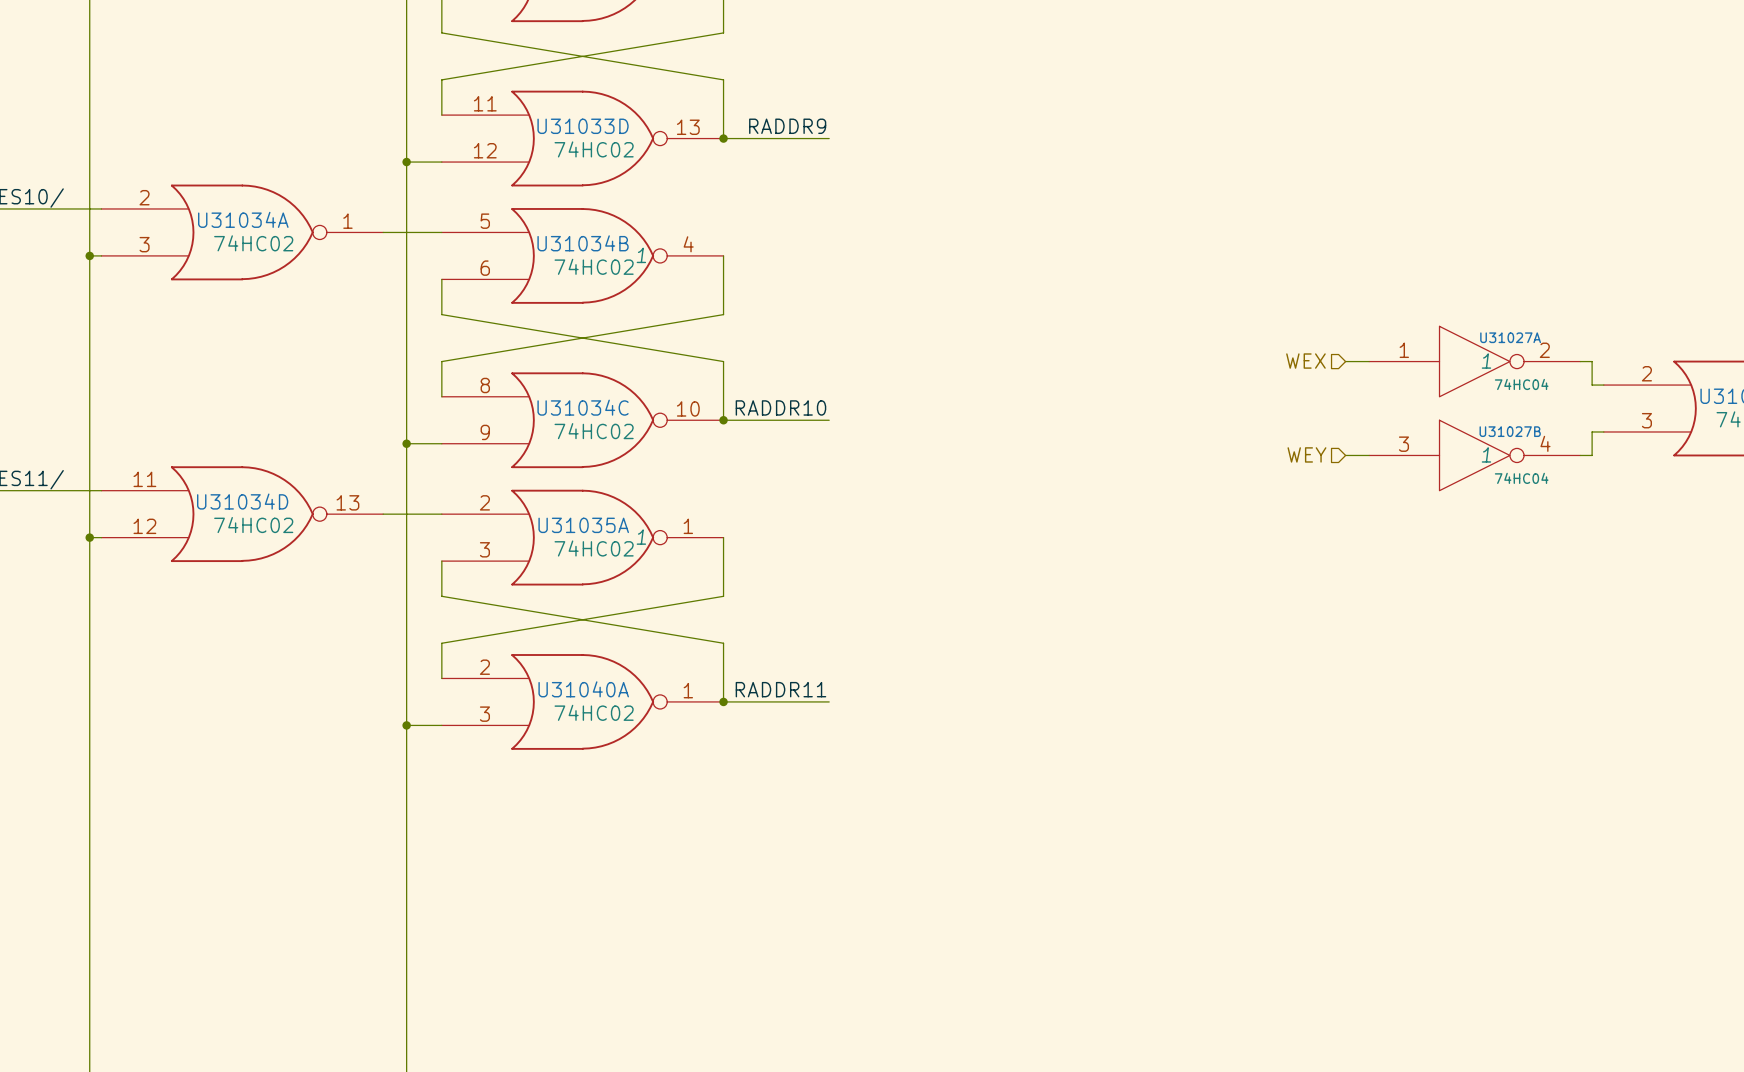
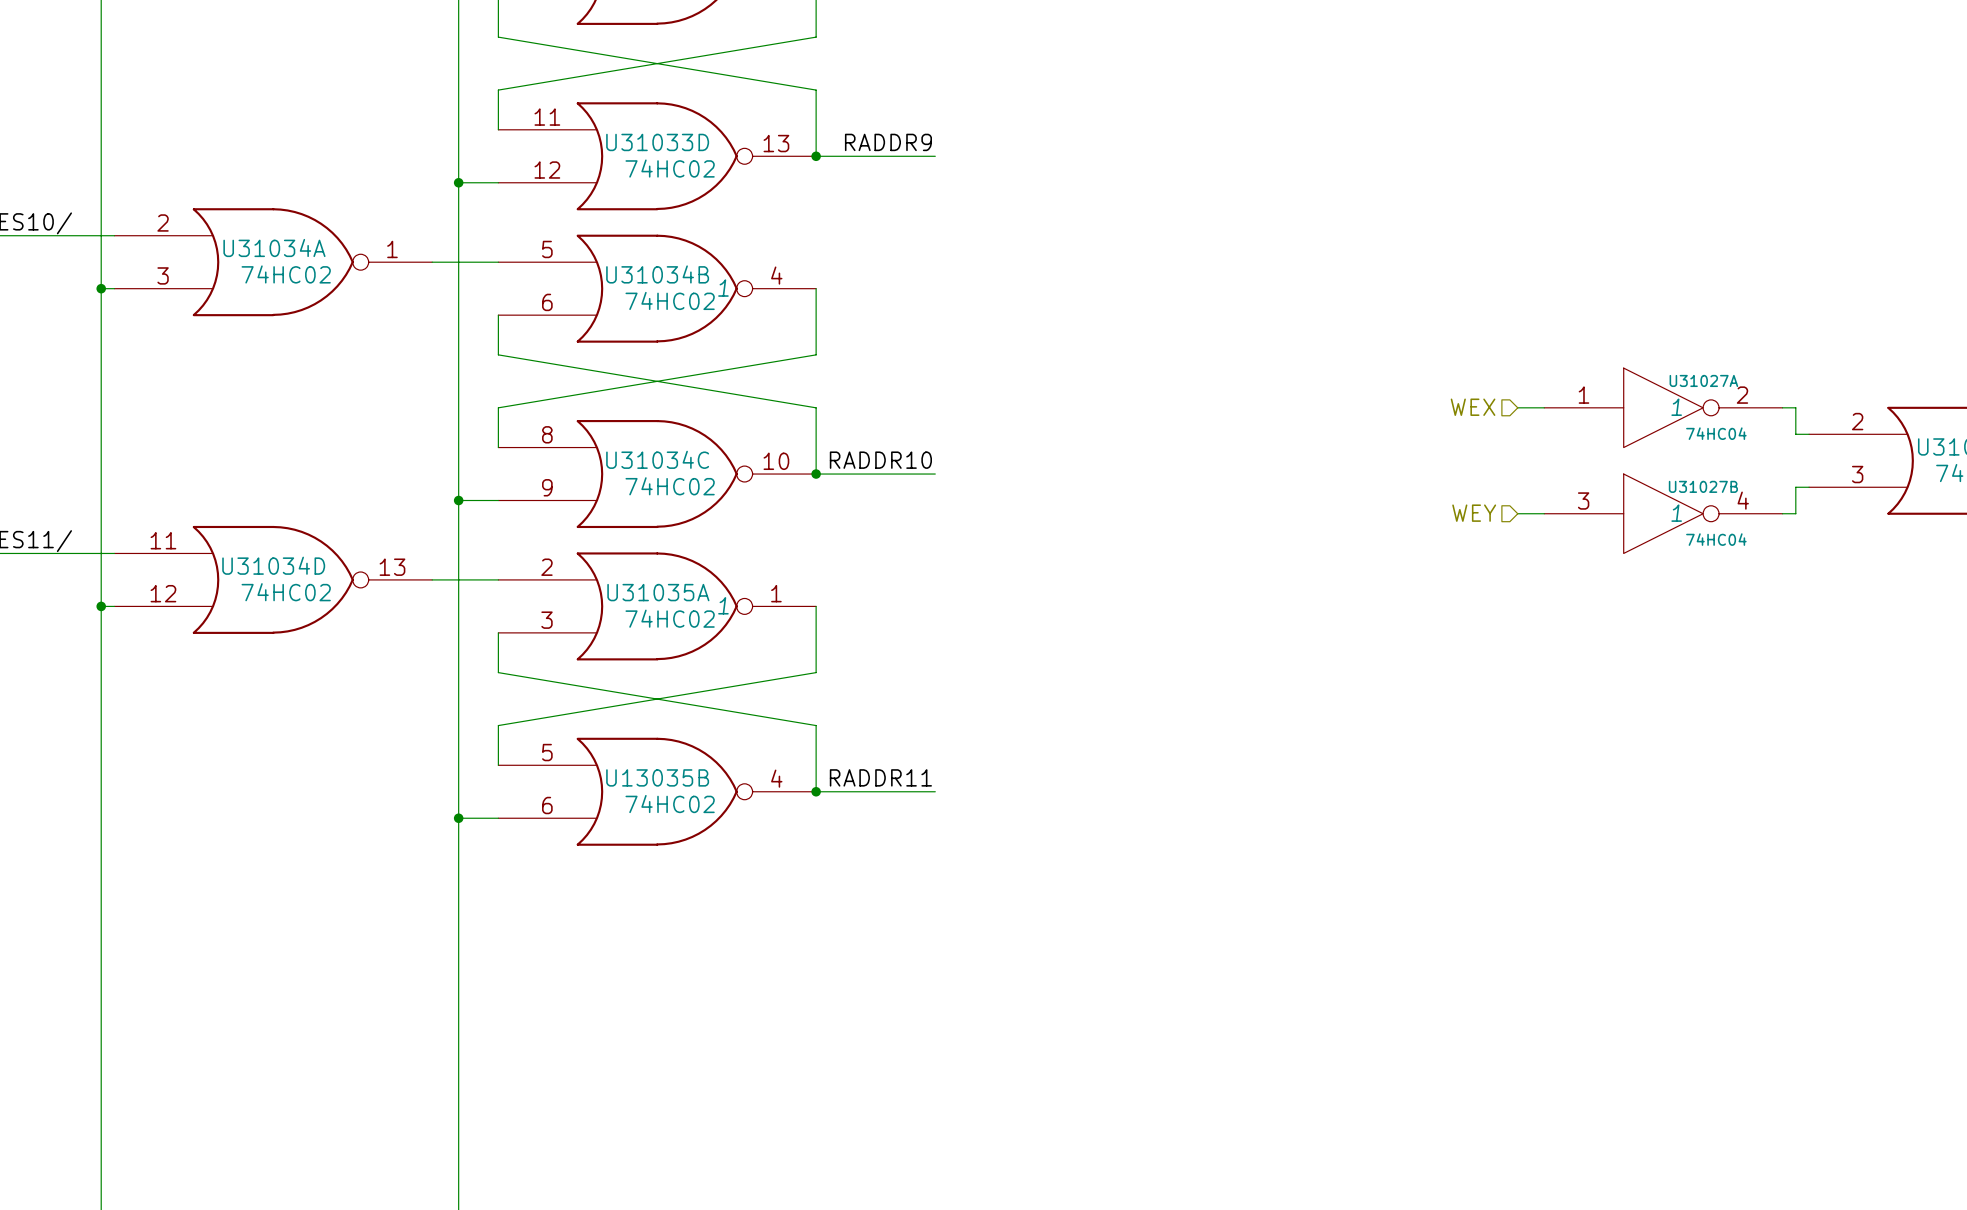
U31040A pin number: 2 (484, 667) -> 5 (547, 752)
U31040A name: U31040A (583, 689) -> U13035B (657, 777)
U31040A pin number: 1 (688, 690) -> 4 (776, 778)
U31040A pin number: 3 (484, 714) -> 6 (547, 805)

